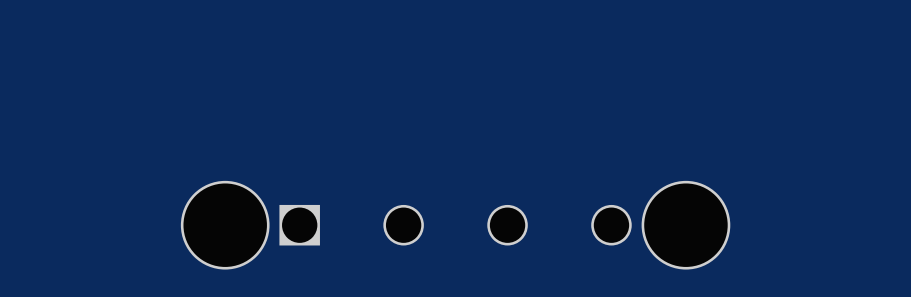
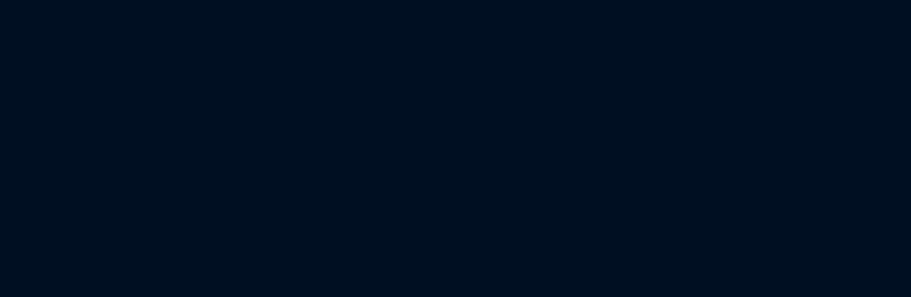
part: (455, 225) -> none

